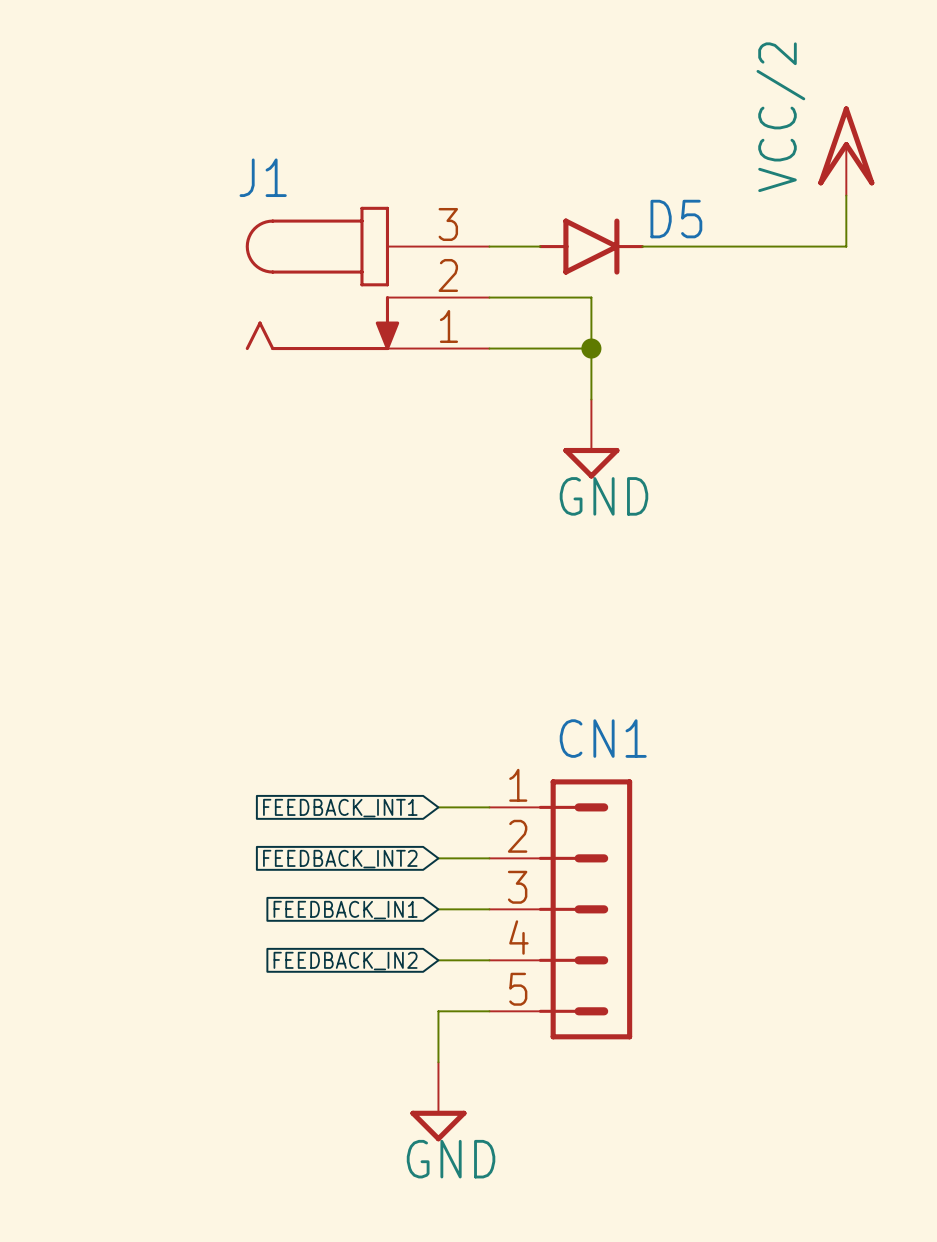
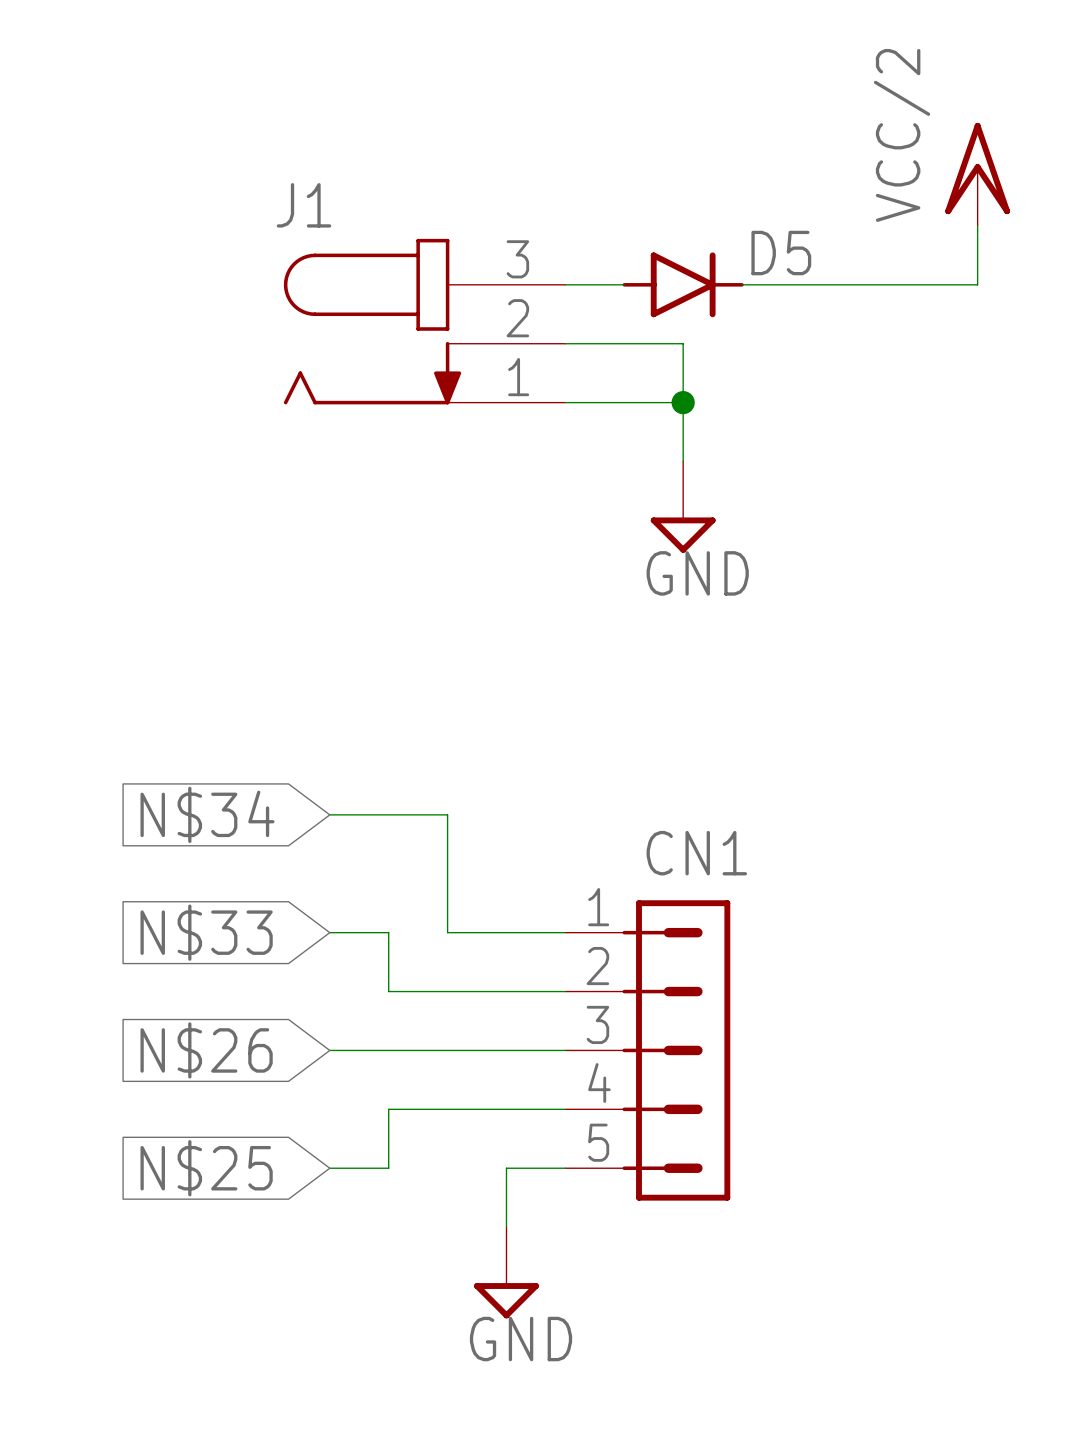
global label: none -> N$34 (207, 814)
wire: none -> (329, 814) (447, 814) (447, 932) (506, 932)
global label: none -> N$33 (206, 932)
wire: none -> (329, 932) (388, 932) (388, 991) (506, 991)
global label: FEEDBACK_INT1 (340, 808) -> none
global label: FEEDBACK_INT2 (340, 859) -> none
global label: none -> N$26 (206, 1050)
wire: none -> (329, 1050) (506, 1050)
global label: FEEDBACK_IN1 (345, 910) -> none
wire: none -> (506, 1109) (388, 1109) (388, 1168) (329, 1168)
global label: FEEDBACK_IN2 (345, 961) -> none
global label: none -> N$25 (206, 1168)

